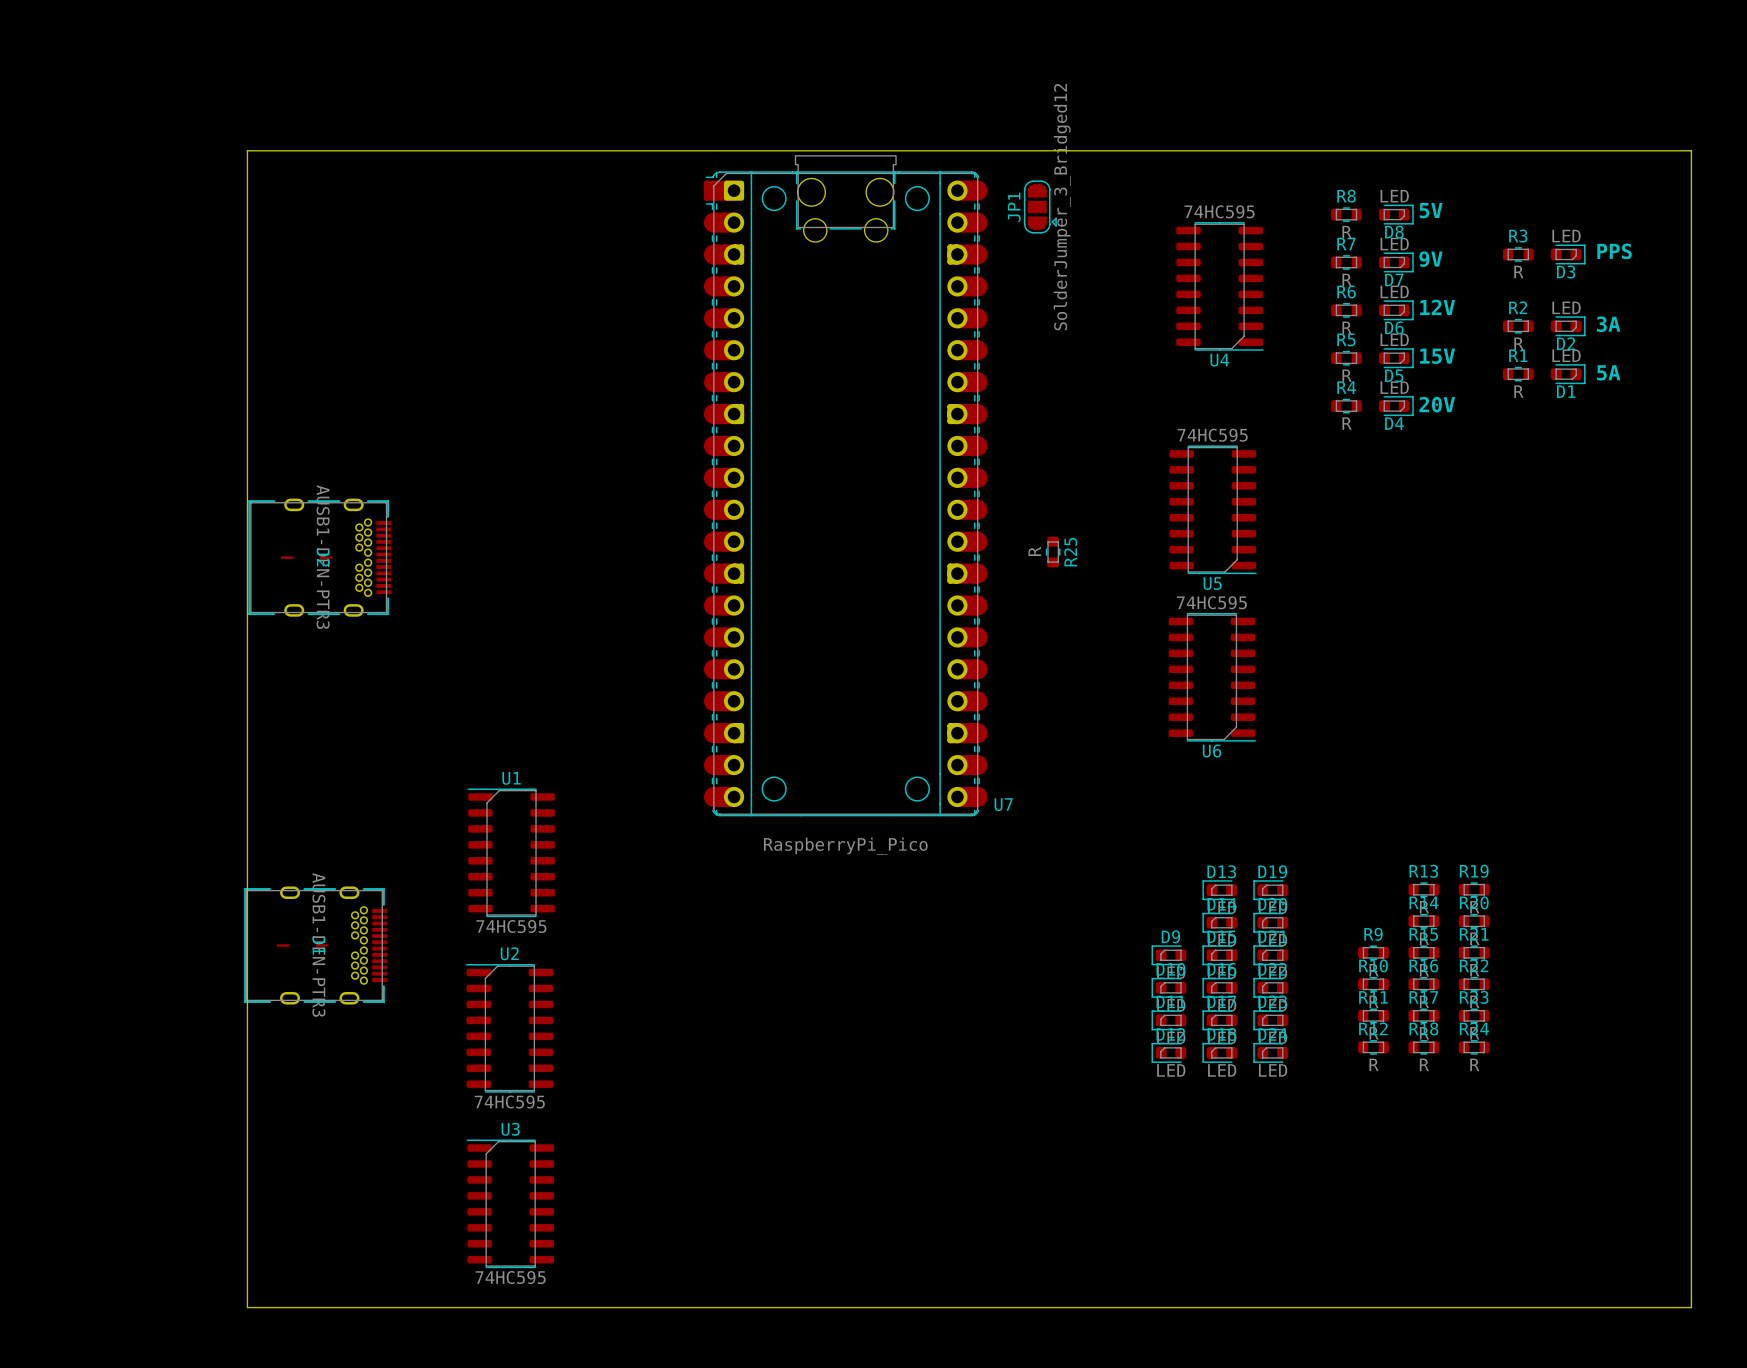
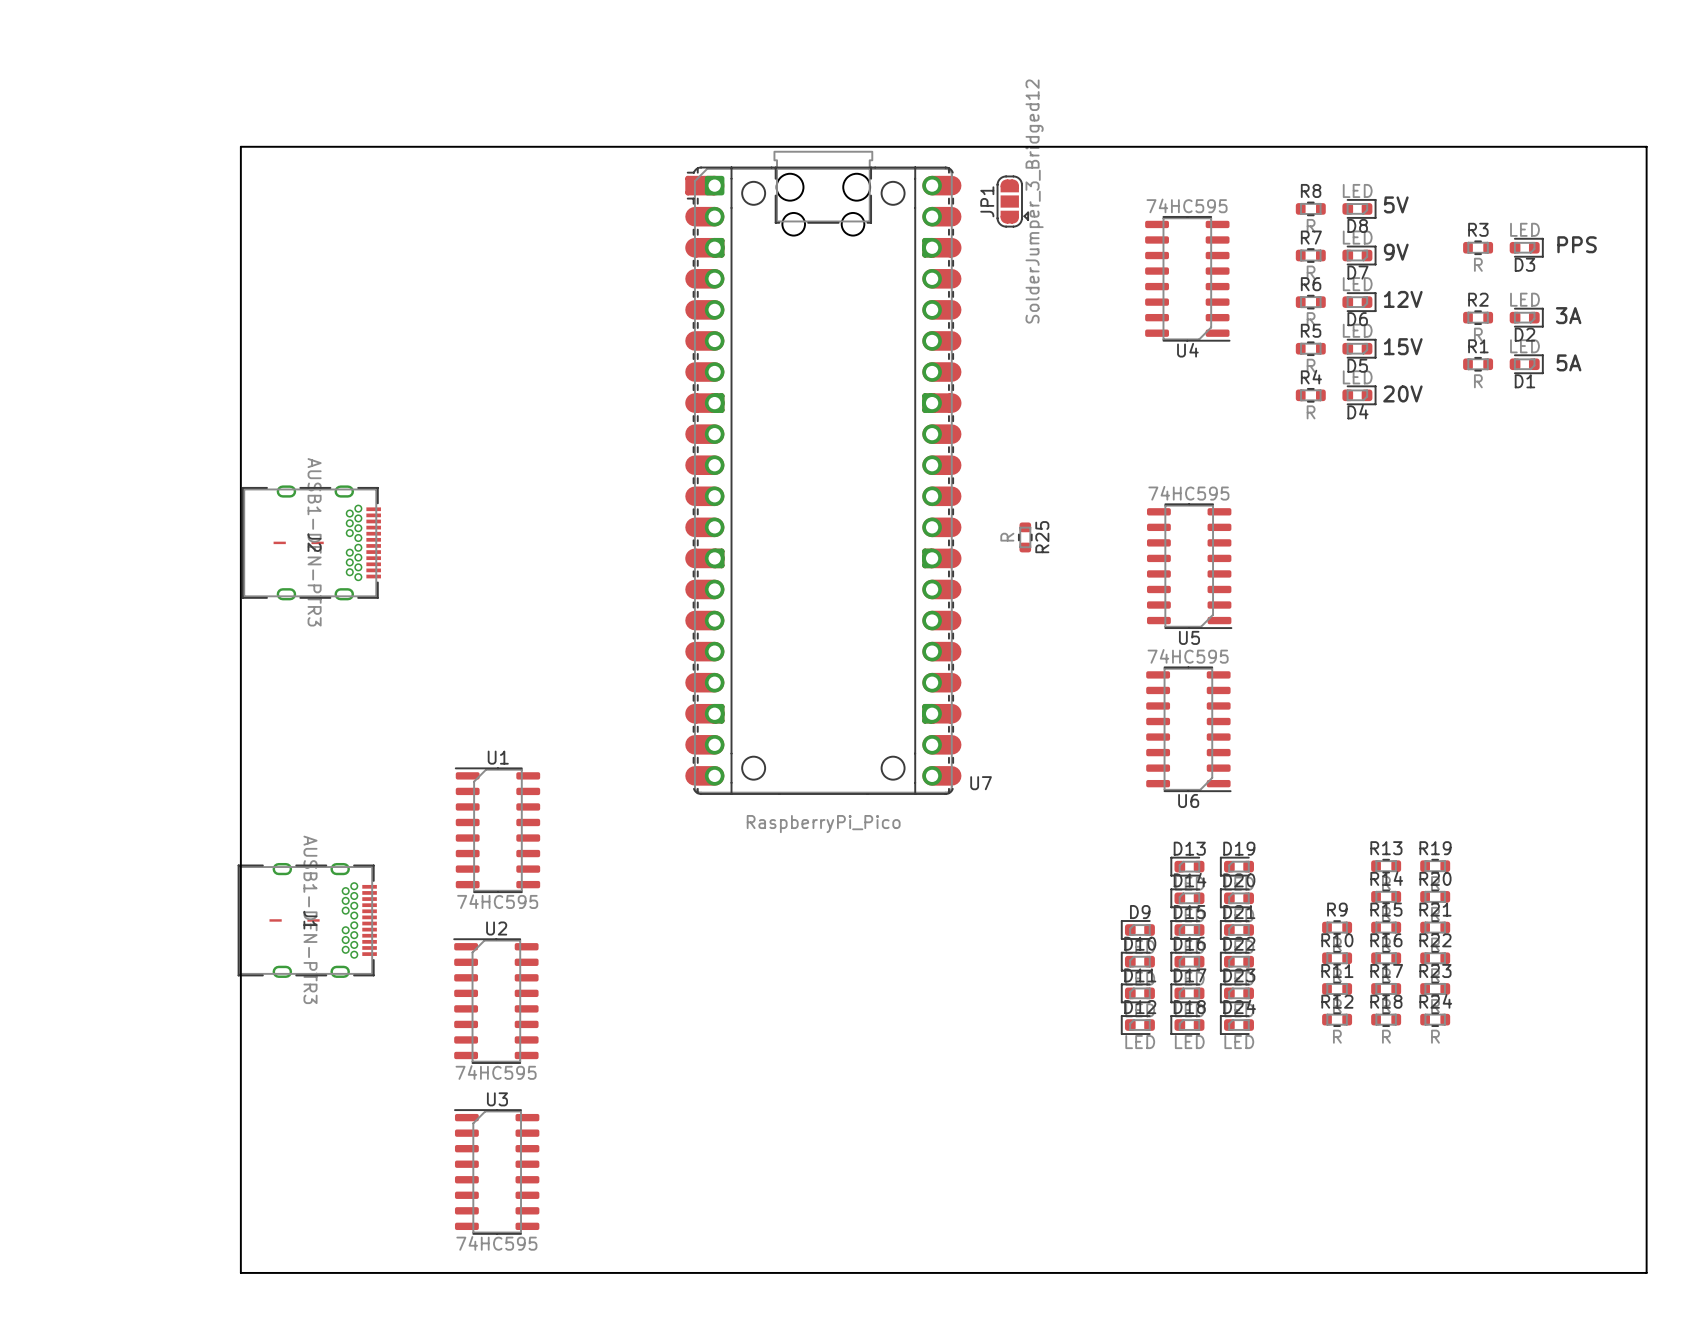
U5 position: (1213, 509) -> (1189, 566)
U6 position: (1212, 677) -> (1188, 729)

